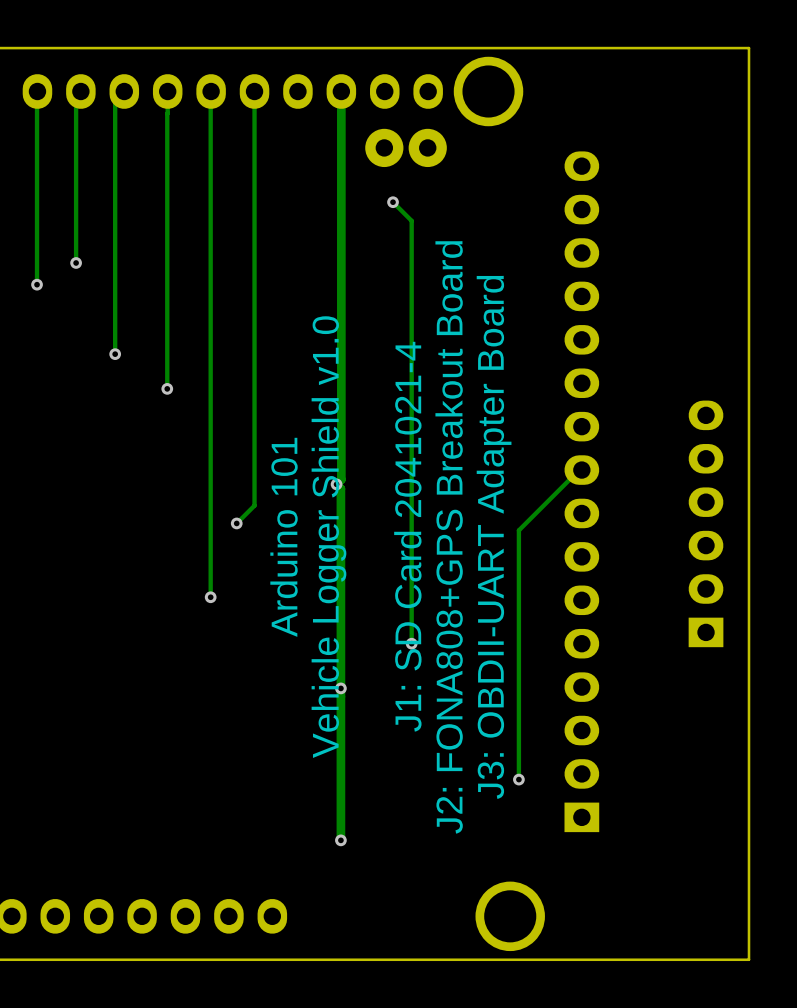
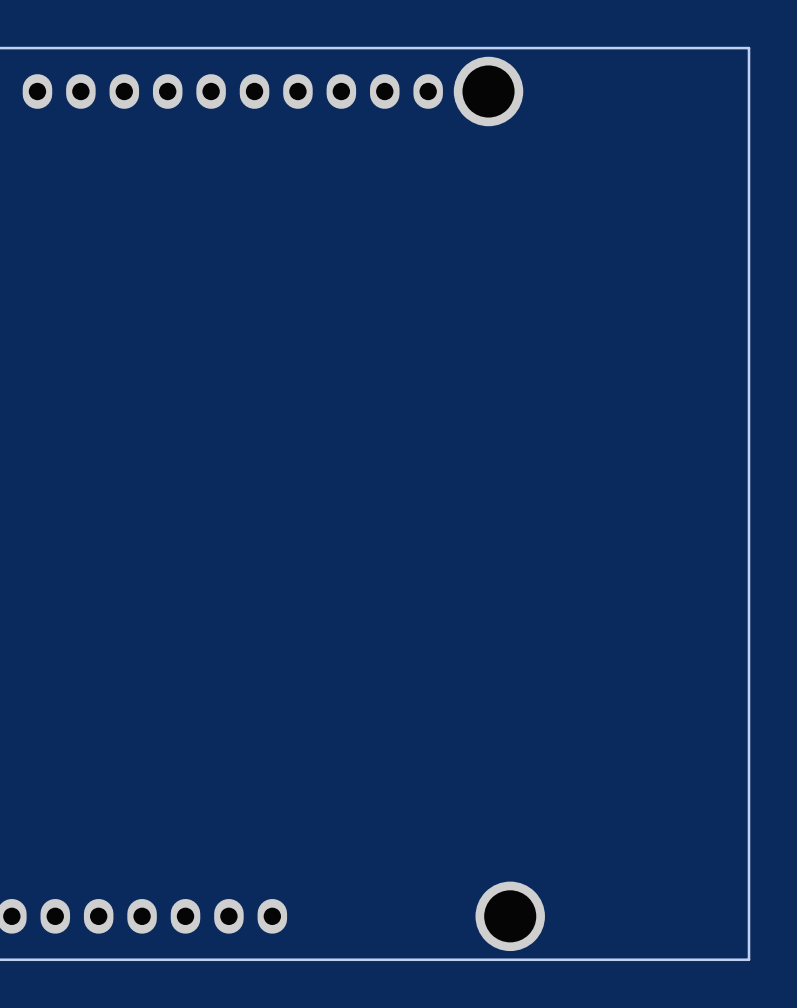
track: (37, 91) (37, 284) -> none
track: (80, 91) (76, 96) (76, 262) -> none
track: (124, 91) (115, 100) (115, 354) -> none
track: (167, 91) (167, 388) -> none
track: (211, 91) (210, 597) -> none
track: (254, 91) (254, 505) (236, 523) -> none
track: (341, 91) (341, 479) (336, 484) (340, 488) (340, 840) -> none
part: (384, 147) -> none
part: (427, 147) -> none
track: (393, 202) (411, 220) (411, 643) -> none
via: (393, 202) -> none
via: (76, 262) -> none
via: (37, 284) -> none
via: (115, 354) -> none
via: (167, 388) -> none
track: (581, 470) (579, 470) (518, 530) (518, 779) -> none
via: (336, 484) -> none
part: (581, 491) -> none
via: (236, 523) -> none
part: (706, 523) -> none
text: J1: SD Card 2041021-4 (407, 536) -> none
text: Arduino 101 (284, 537) -> none
text: Vehicle Logger Shield v1.0 (328, 537) -> none
text: J2: FONA808+GPS Breakout Board (449, 537) -> none
text: J3: OBDII-UART Adapter Board (494, 537) -> none
via: (210, 597) -> none
via: (411, 643) -> none
via: (340, 688) -> none
via: (518, 779) -> none
via: (340, 840) -> none

